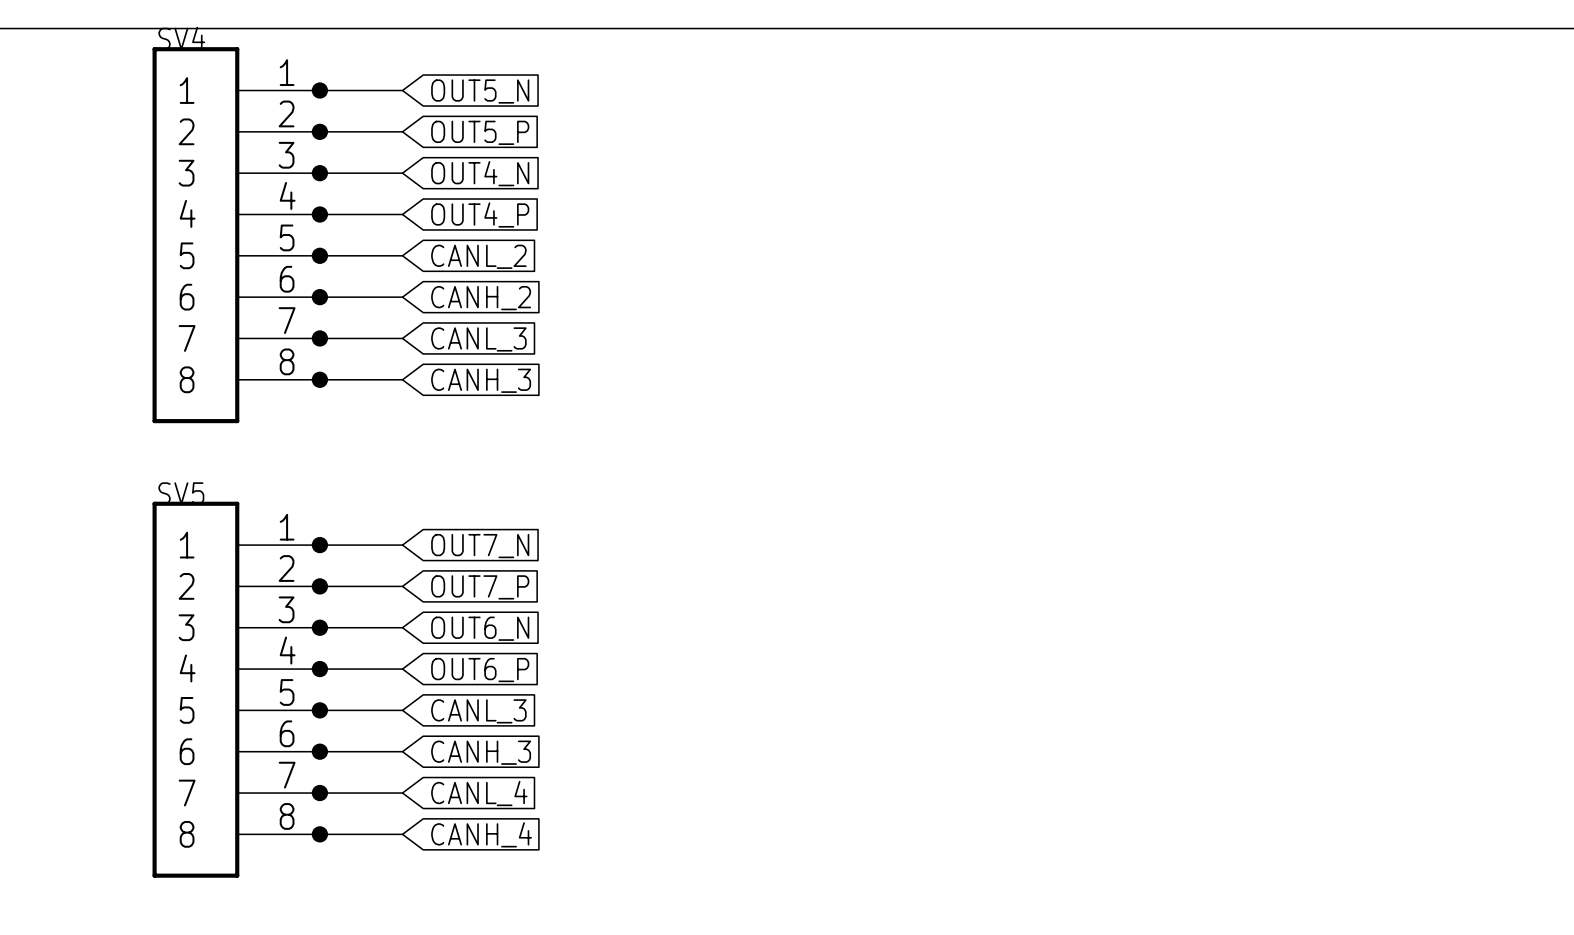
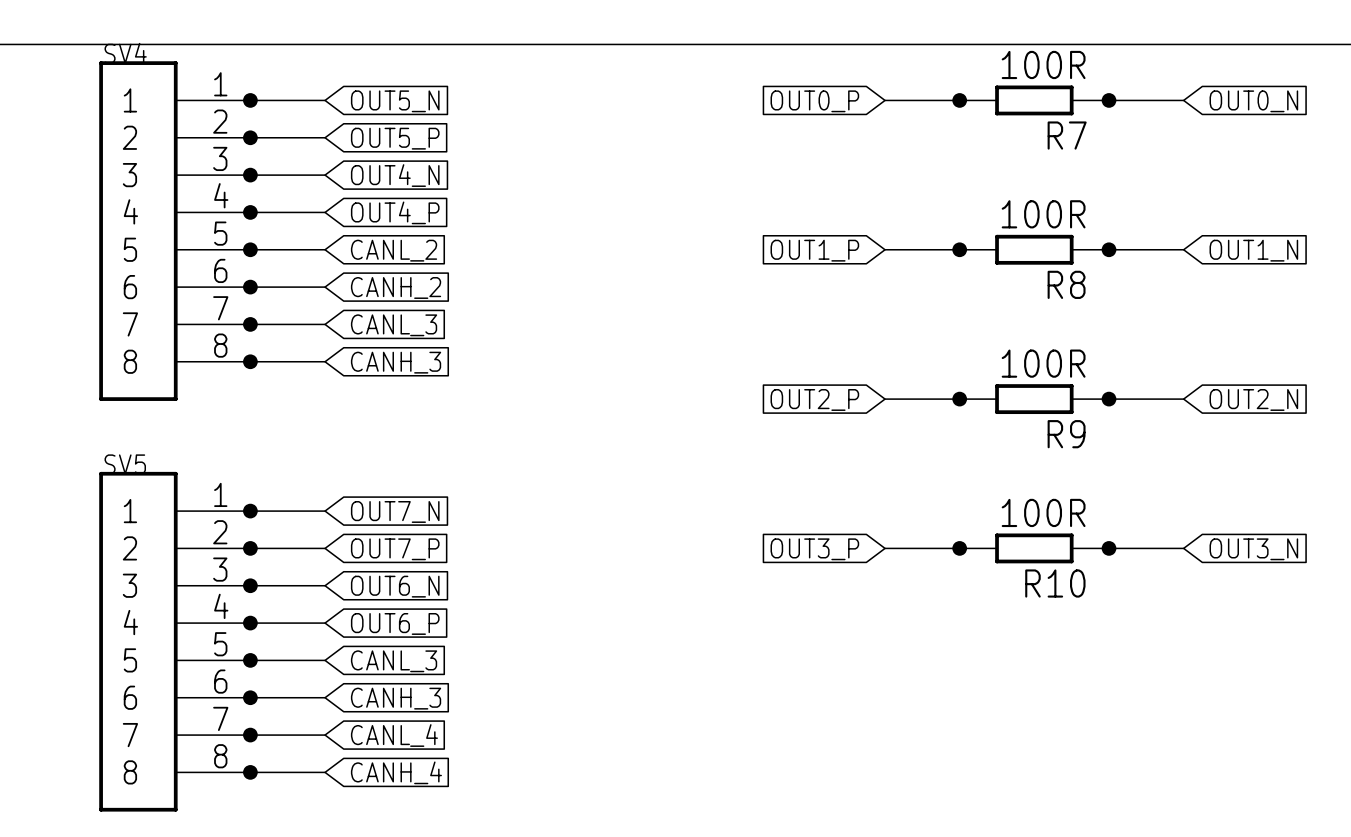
wire: none -> (885, 100) (959, 100)
junction: none -> (959, 100)
R7: none -> 100R (1034, 100)
wire: none -> (1109, 100) (1183, 100)
junction: none -> (1109, 100)
global label: none -> OUT0_P (814, 101)
global label: none -> OUT0_N (1253, 101)
wire: none -> (885, 249) (959, 249)
junction: none -> (959, 249)
R8: none -> 100R (1034, 249)
wire: none -> (1109, 249) (1183, 249)
junction: none -> (1109, 249)
global label: none -> OUT1_P (814, 250)
global label: none -> OUT1_N (1253, 250)
wire: none -> (885, 399) (959, 399)
junction: none -> (959, 399)
R9: none -> 100R (1034, 399)
wire: none -> (1109, 399) (1183, 399)
junction: none -> (1109, 399)
global label: none -> OUT2_P (814, 399)
global label: none -> OUT2_N (1253, 399)
wire: none -> (885, 548) (959, 548)
junction: none -> (959, 548)
R10: none -> 100R (1034, 548)
wire: none -> (1109, 548) (1183, 548)
junction: none -> (1109, 548)
global label: none -> OUT3_P (814, 549)
global label: none -> OUT3_N (1253, 549)

